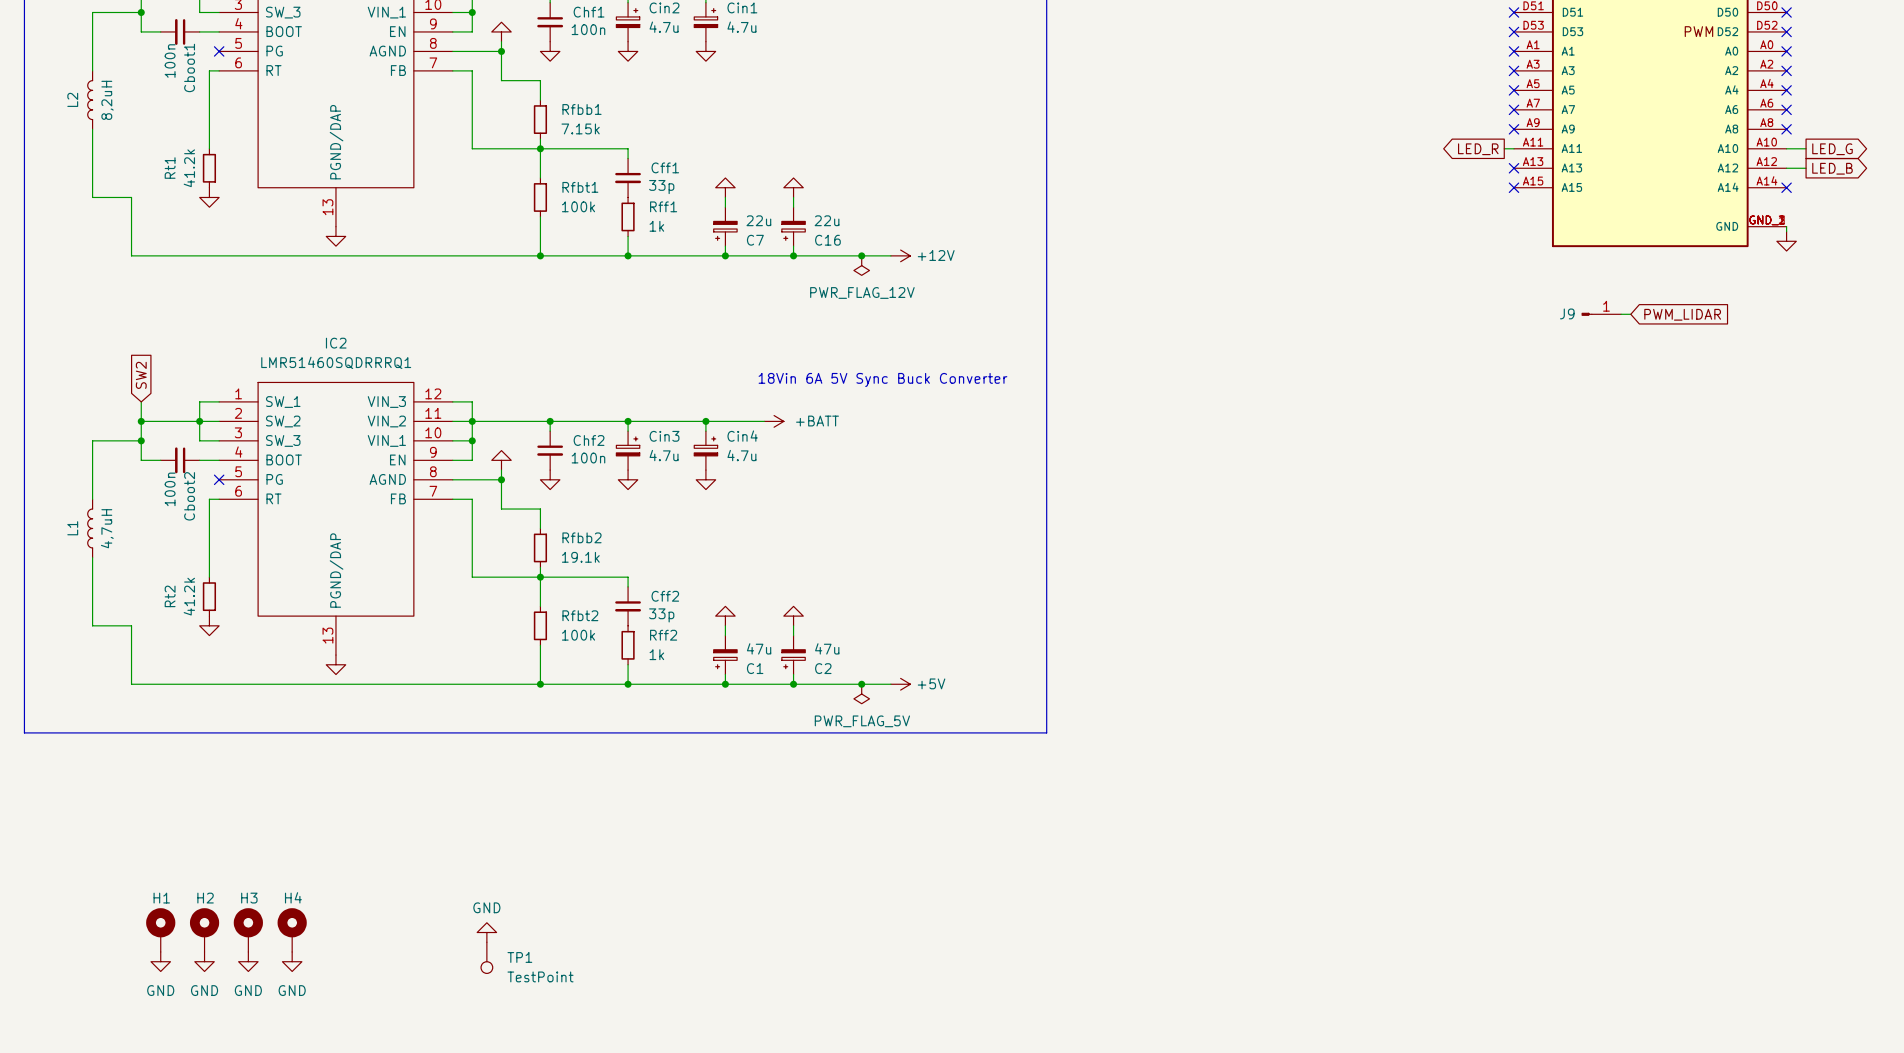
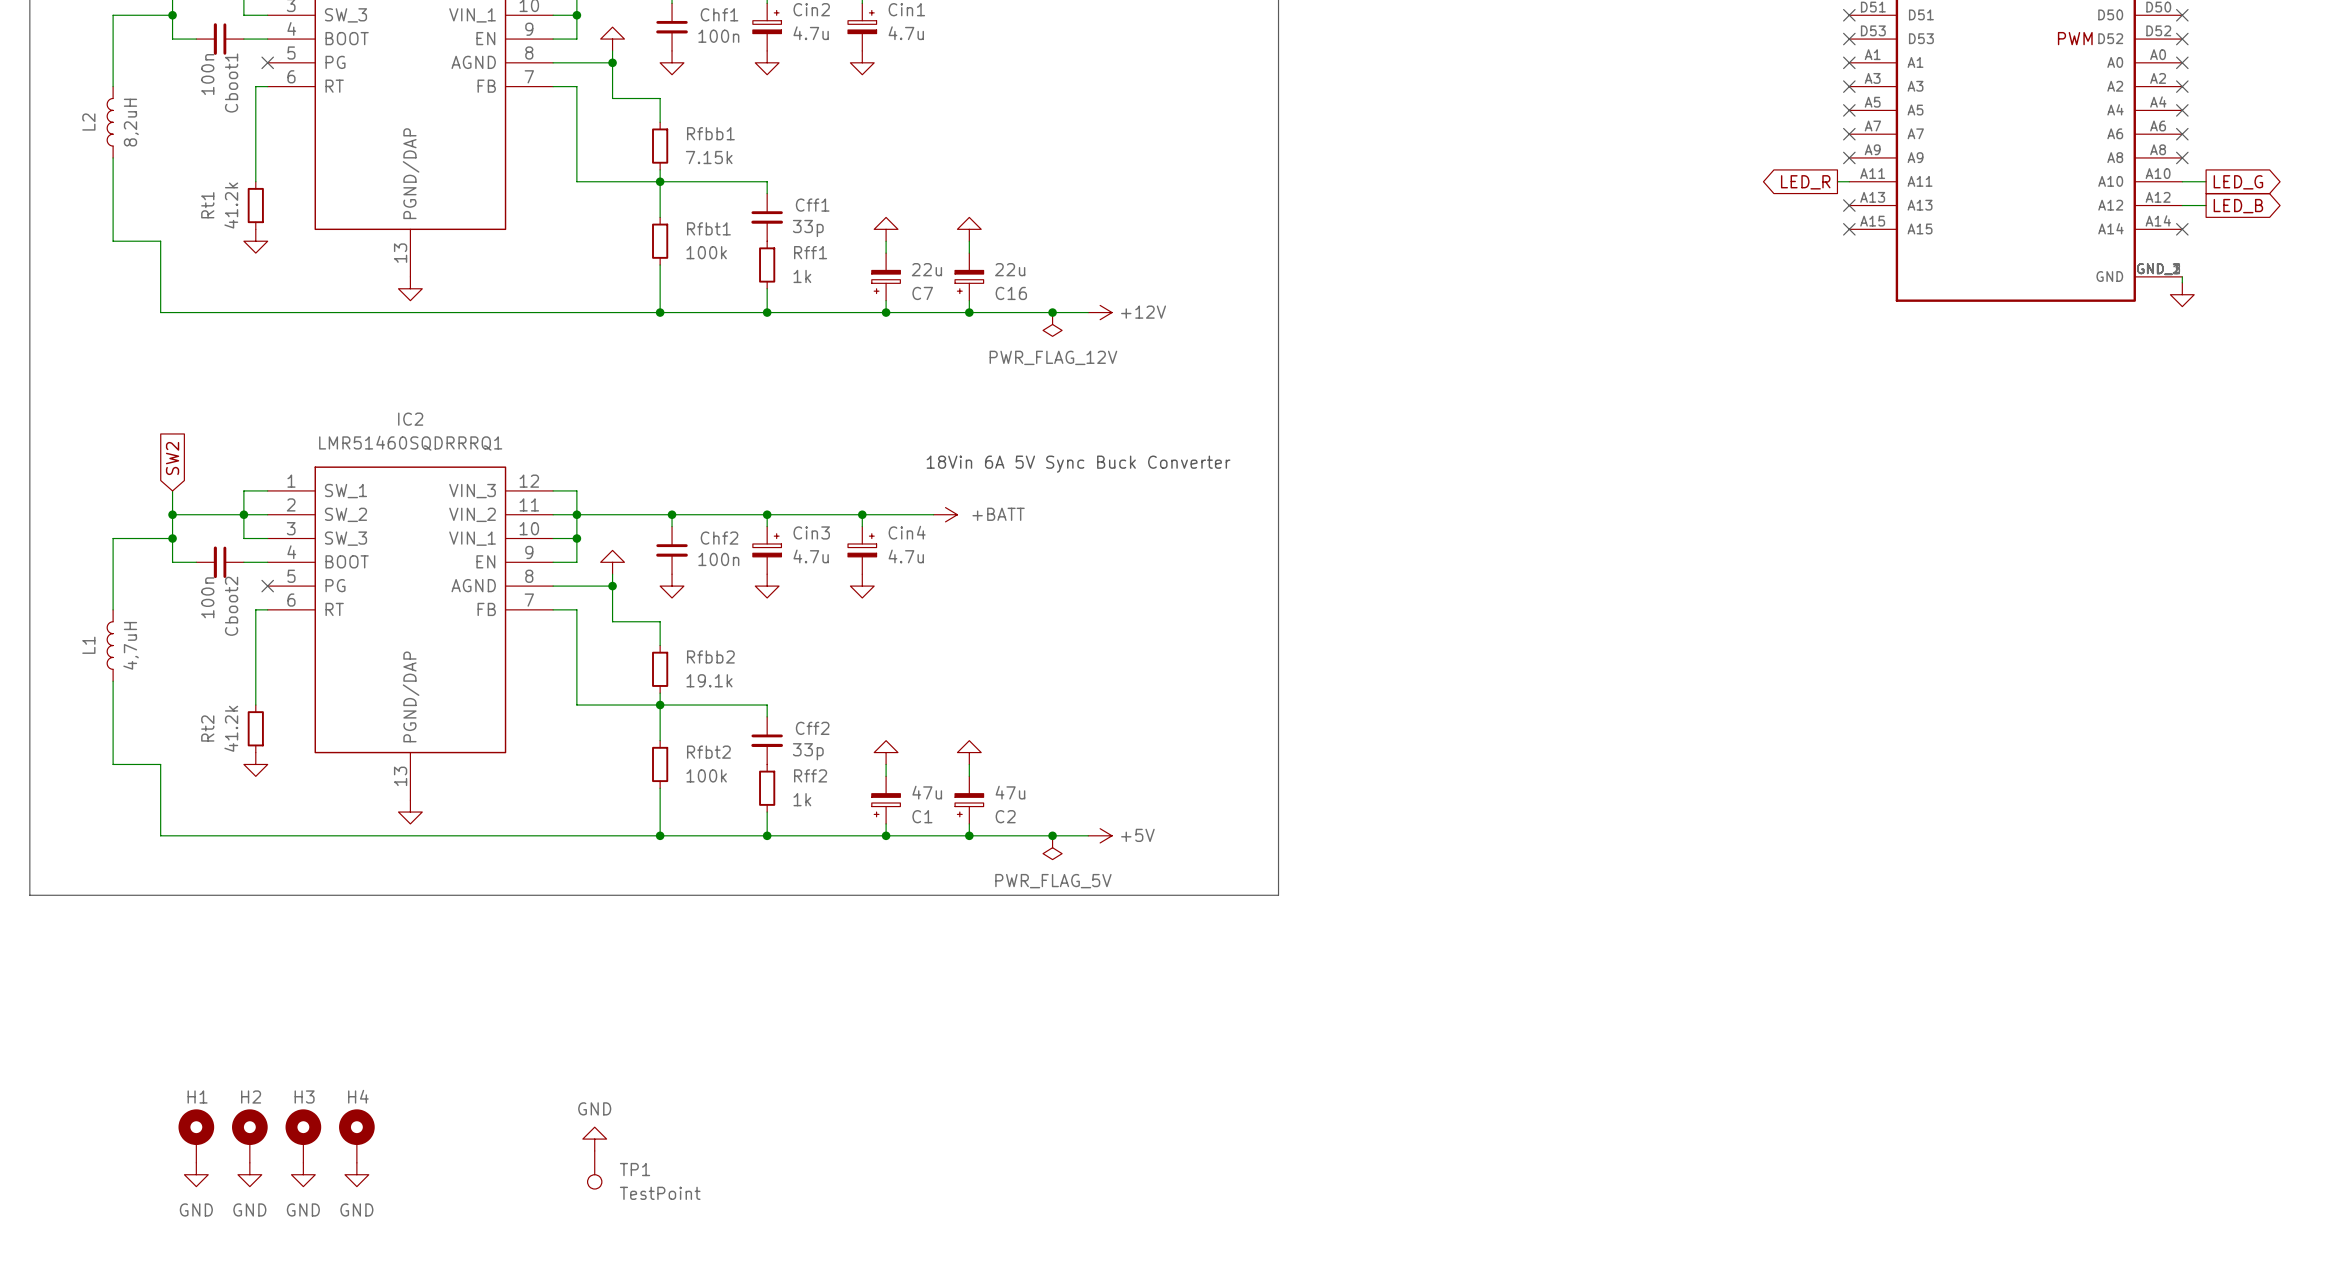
J9: (1601, 314) -> none
wire: (1621, 314) (1630, 314) -> none
global label: PWM_LIDAR (1682, 314) -> none

